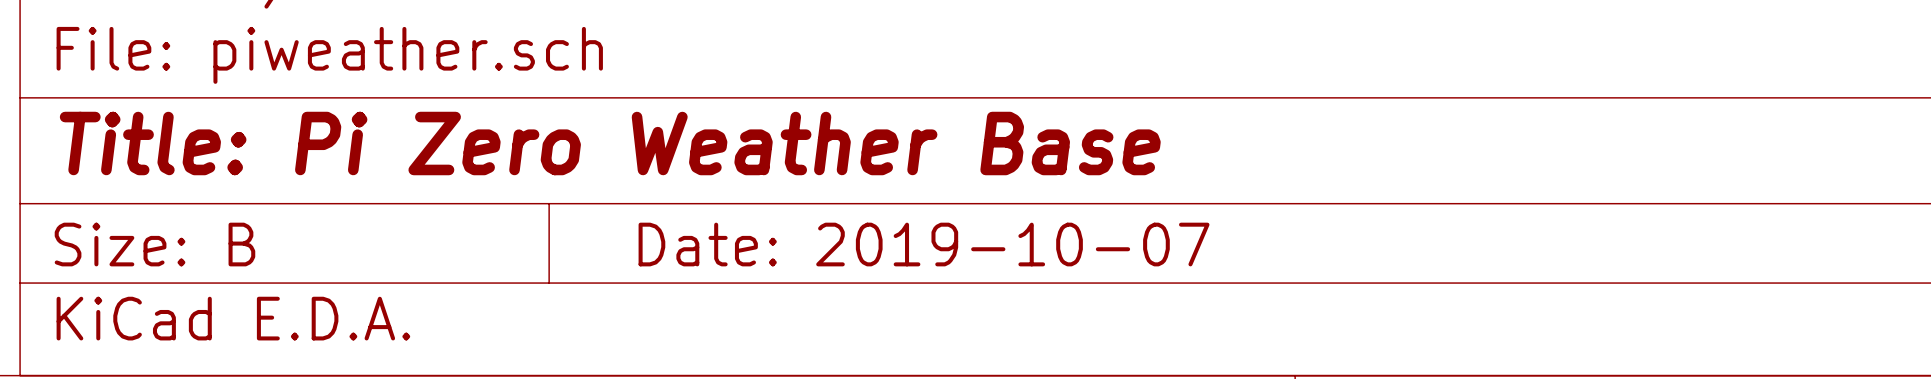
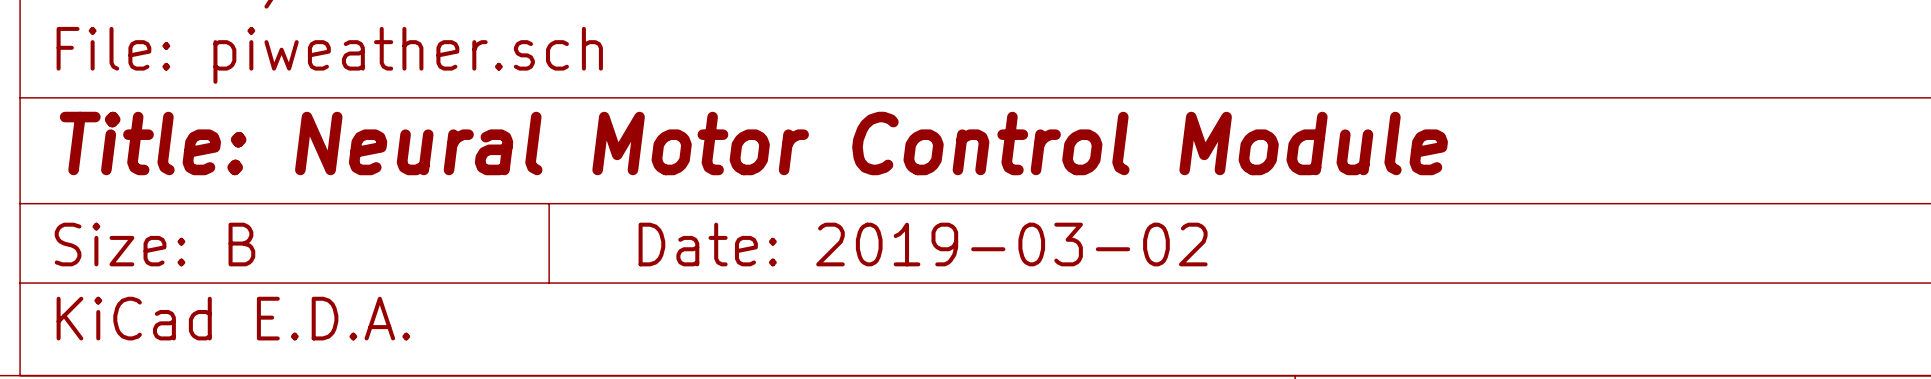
title block: Title: Pi Zero Weather Base (610, 143) -> Title: Neural Motor Control Module (753, 143)
title block: Date: 2019-10-07 (924, 244) -> Date: 2019-03-02 (923, 244)

